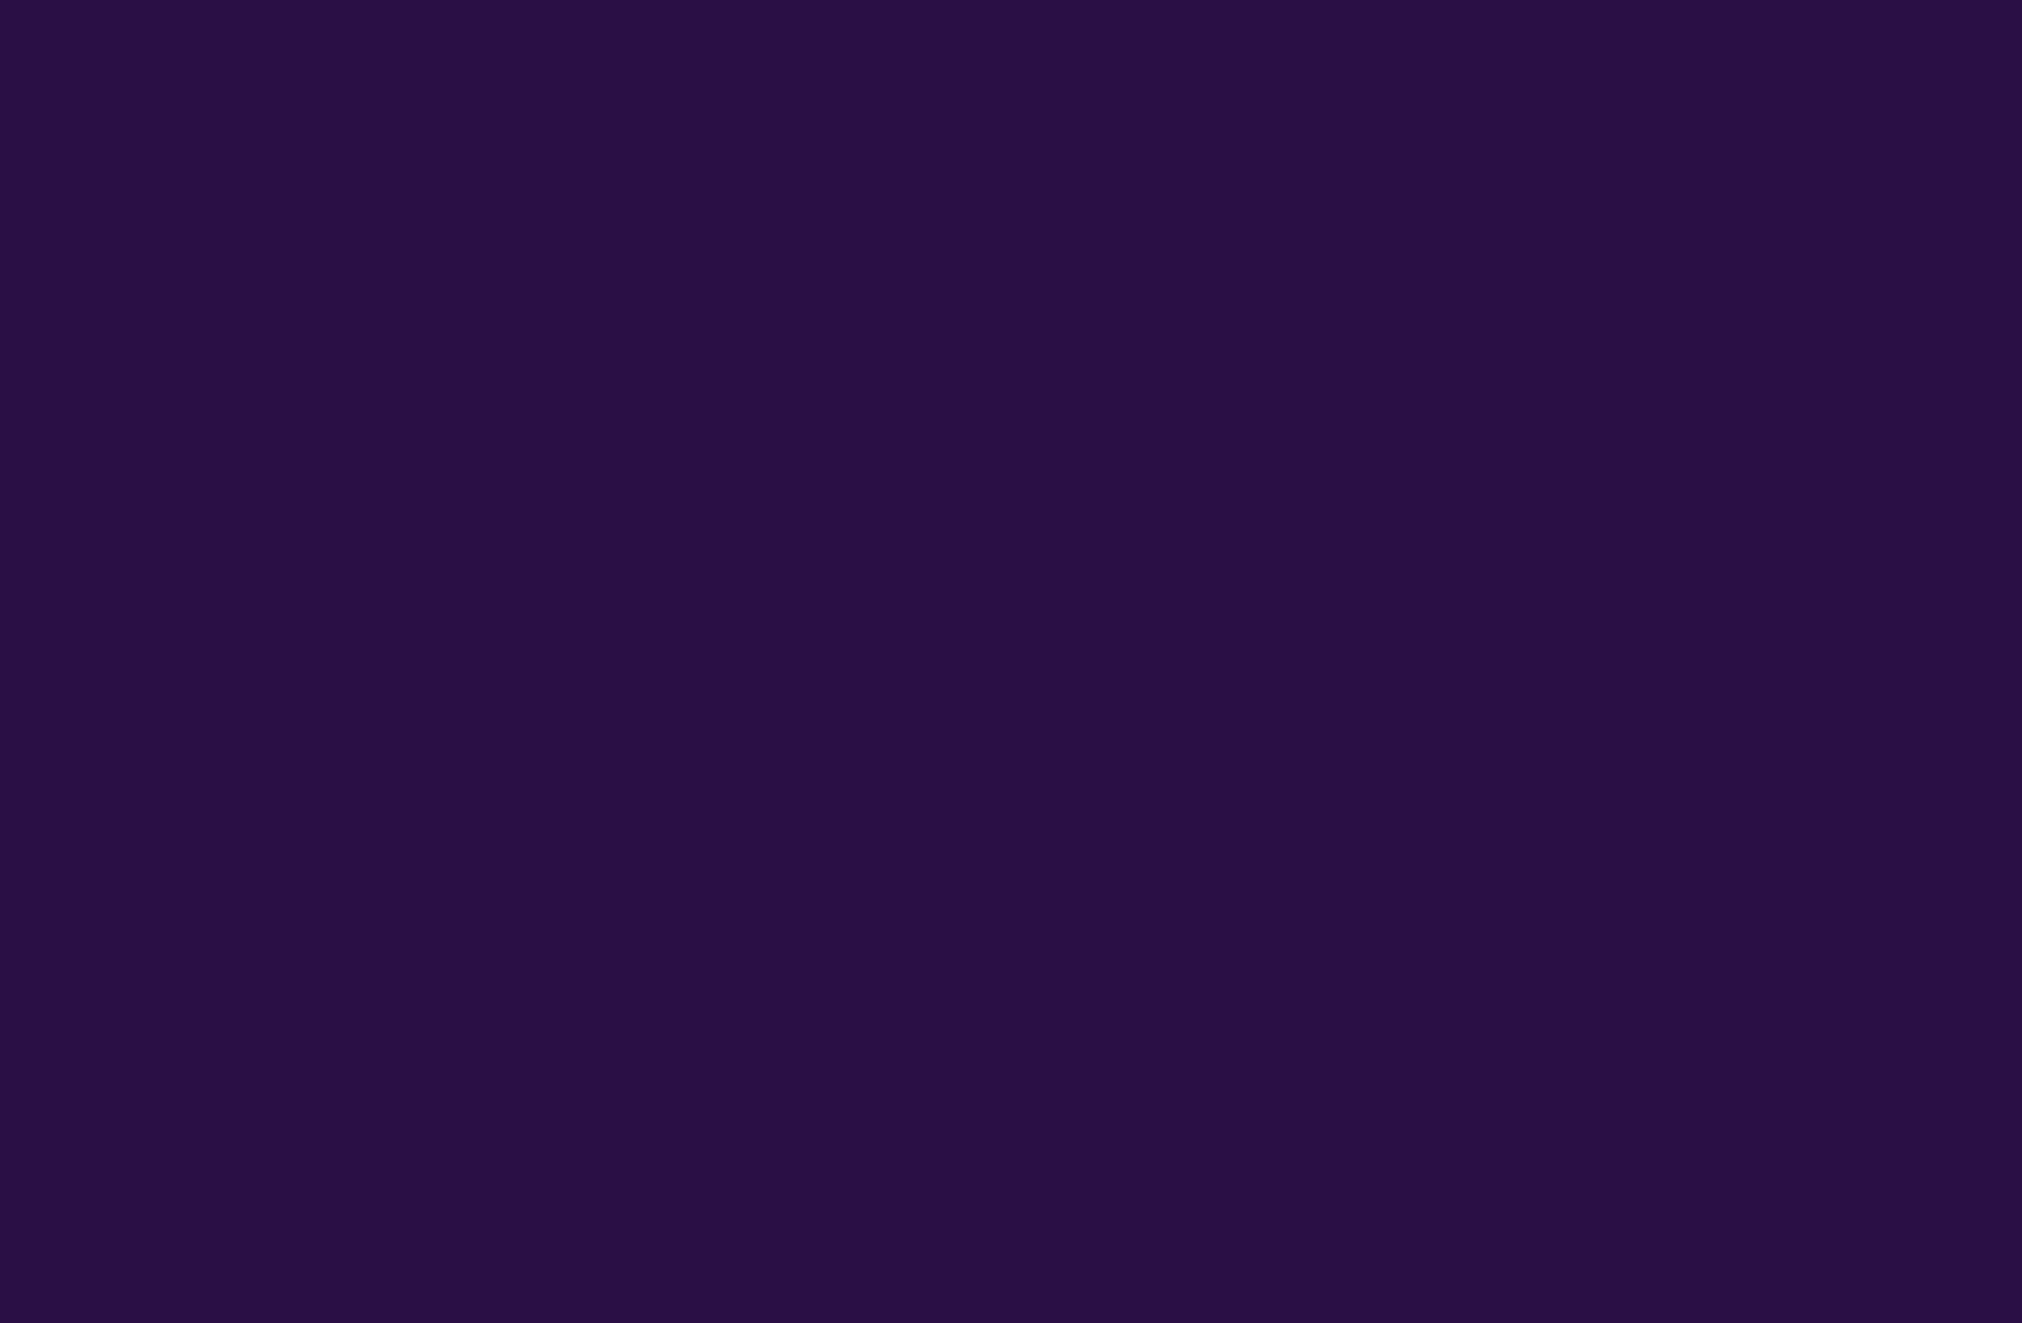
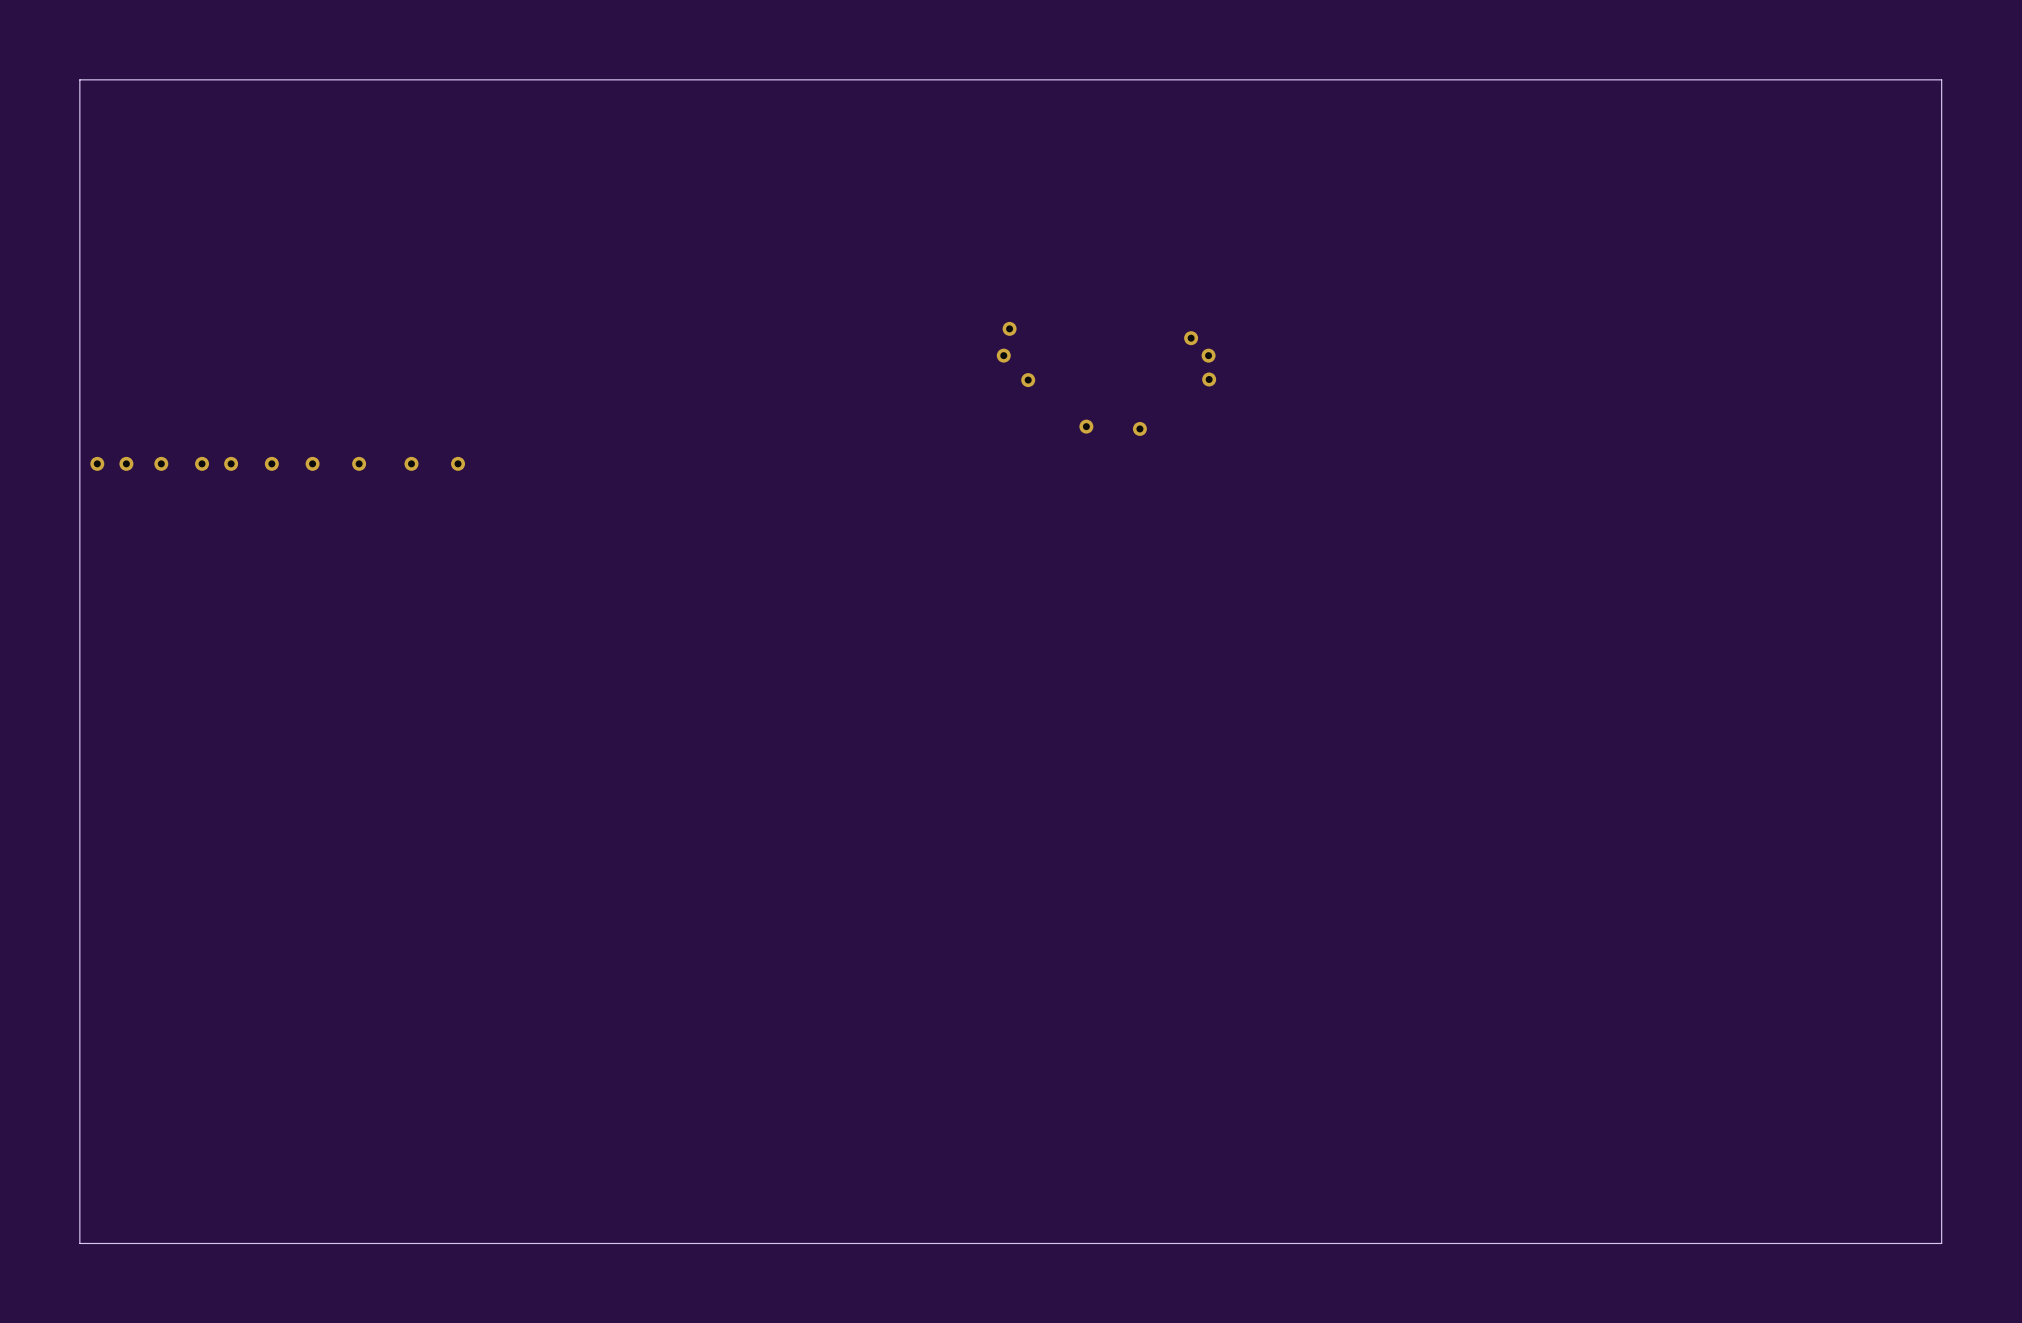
board edge: none -> (1941, 79) (1941, 1243) (79, 1243) (79, 79) (1941, 79)
via: none -> (1009, 328)
via: none -> (1191, 338)
via: none -> (1003, 355)
via: none -> (1208, 355)
via: none -> (1209, 379)
via: none -> (1028, 380)
via: none -> (1086, 426)
via: none -> (1139, 428)
via: none -> (97, 463)
via: none -> (126, 463)
via: none -> (161, 463)
via: none -> (202, 463)
via: none -> (231, 463)
via: none -> (271, 463)
via: none -> (312, 463)
via: none -> (359, 463)
via: none -> (411, 463)
via: none -> (458, 463)

